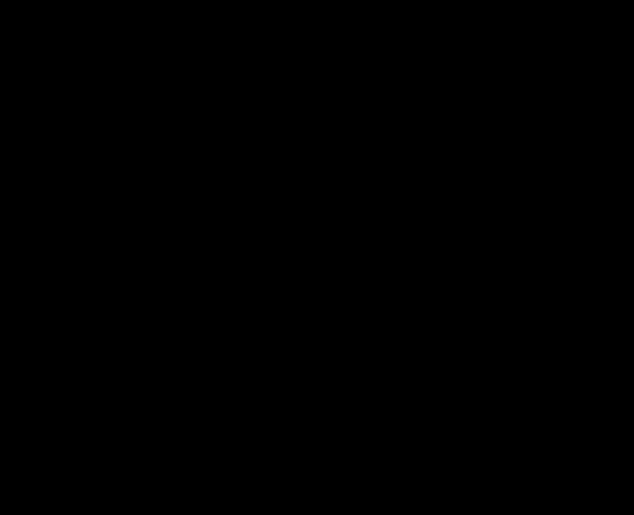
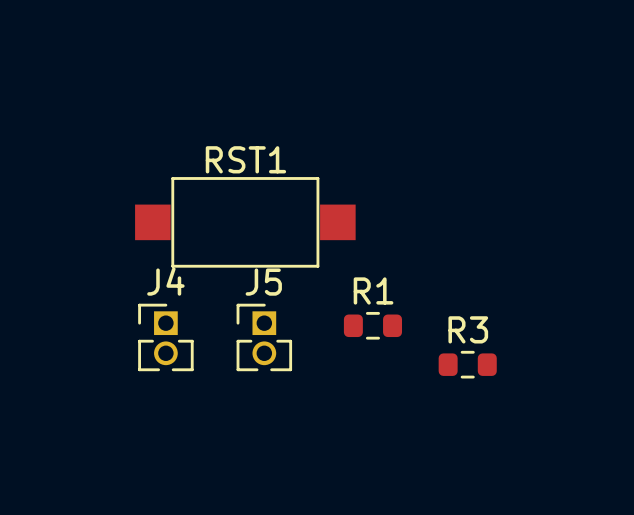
RST1: none -> (245, 222)
R1: none -> (372, 325)
J4: none -> (165, 337)
J5: none -> (264, 337)
R3: none -> (467, 364)

